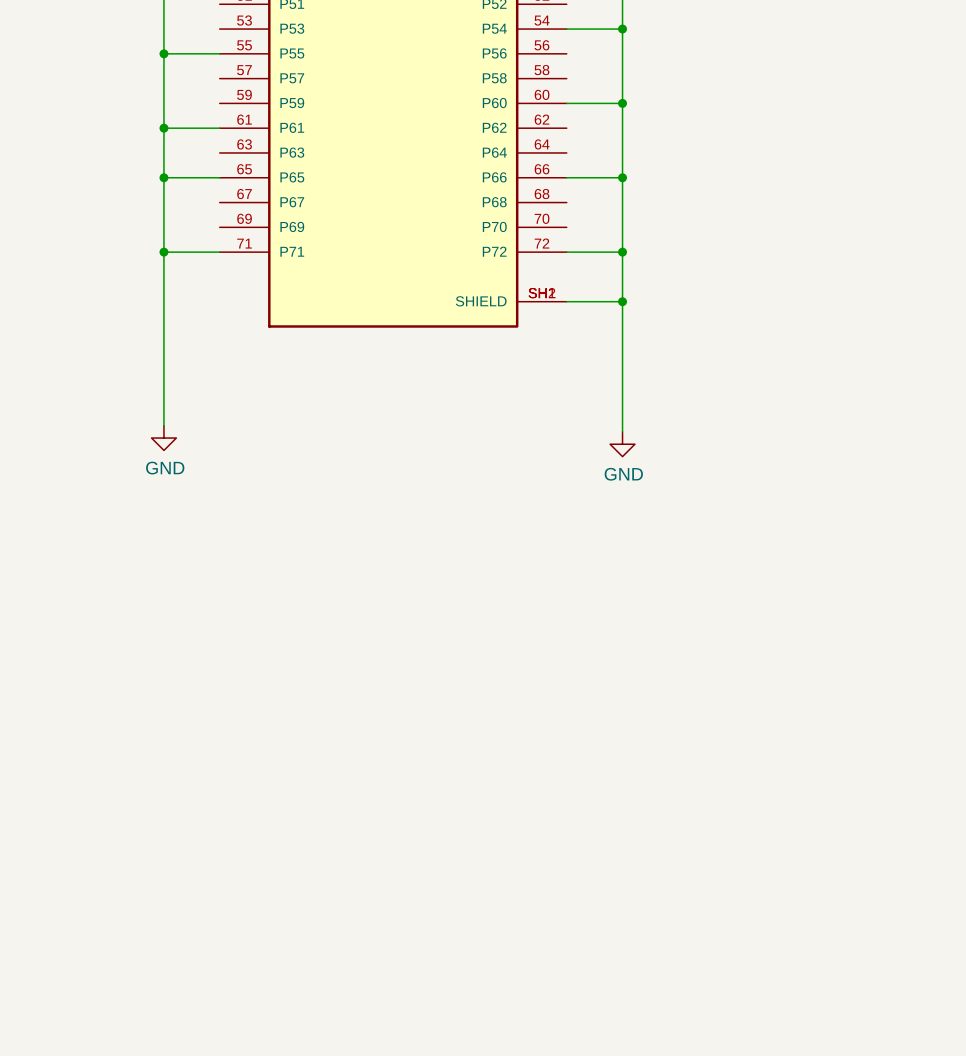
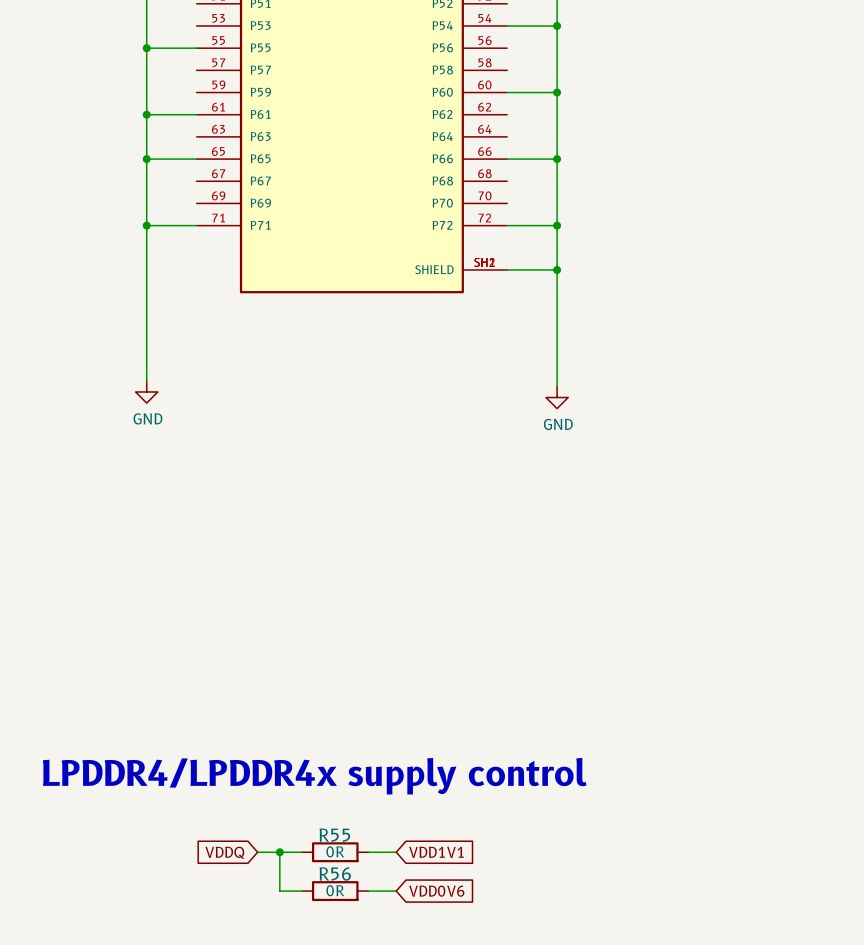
text: none -> LPDDR4/LPDDR4x supply control (314, 776)
wire: none -> (257, 852) (302, 852)
wire: none -> (279, 852) (279, 891) (302, 891)
junction: none -> (279, 852)
R55: none -> (335, 852)
wire: none -> (368, 852) (396, 852)
global label: none -> VDD1V1 (436, 852)
global label: none -> VDDQ (224, 852)
R56: none -> (335, 891)
wire: none -> (368, 891) (396, 891)
global label: none -> VDD0V6 (436, 891)

